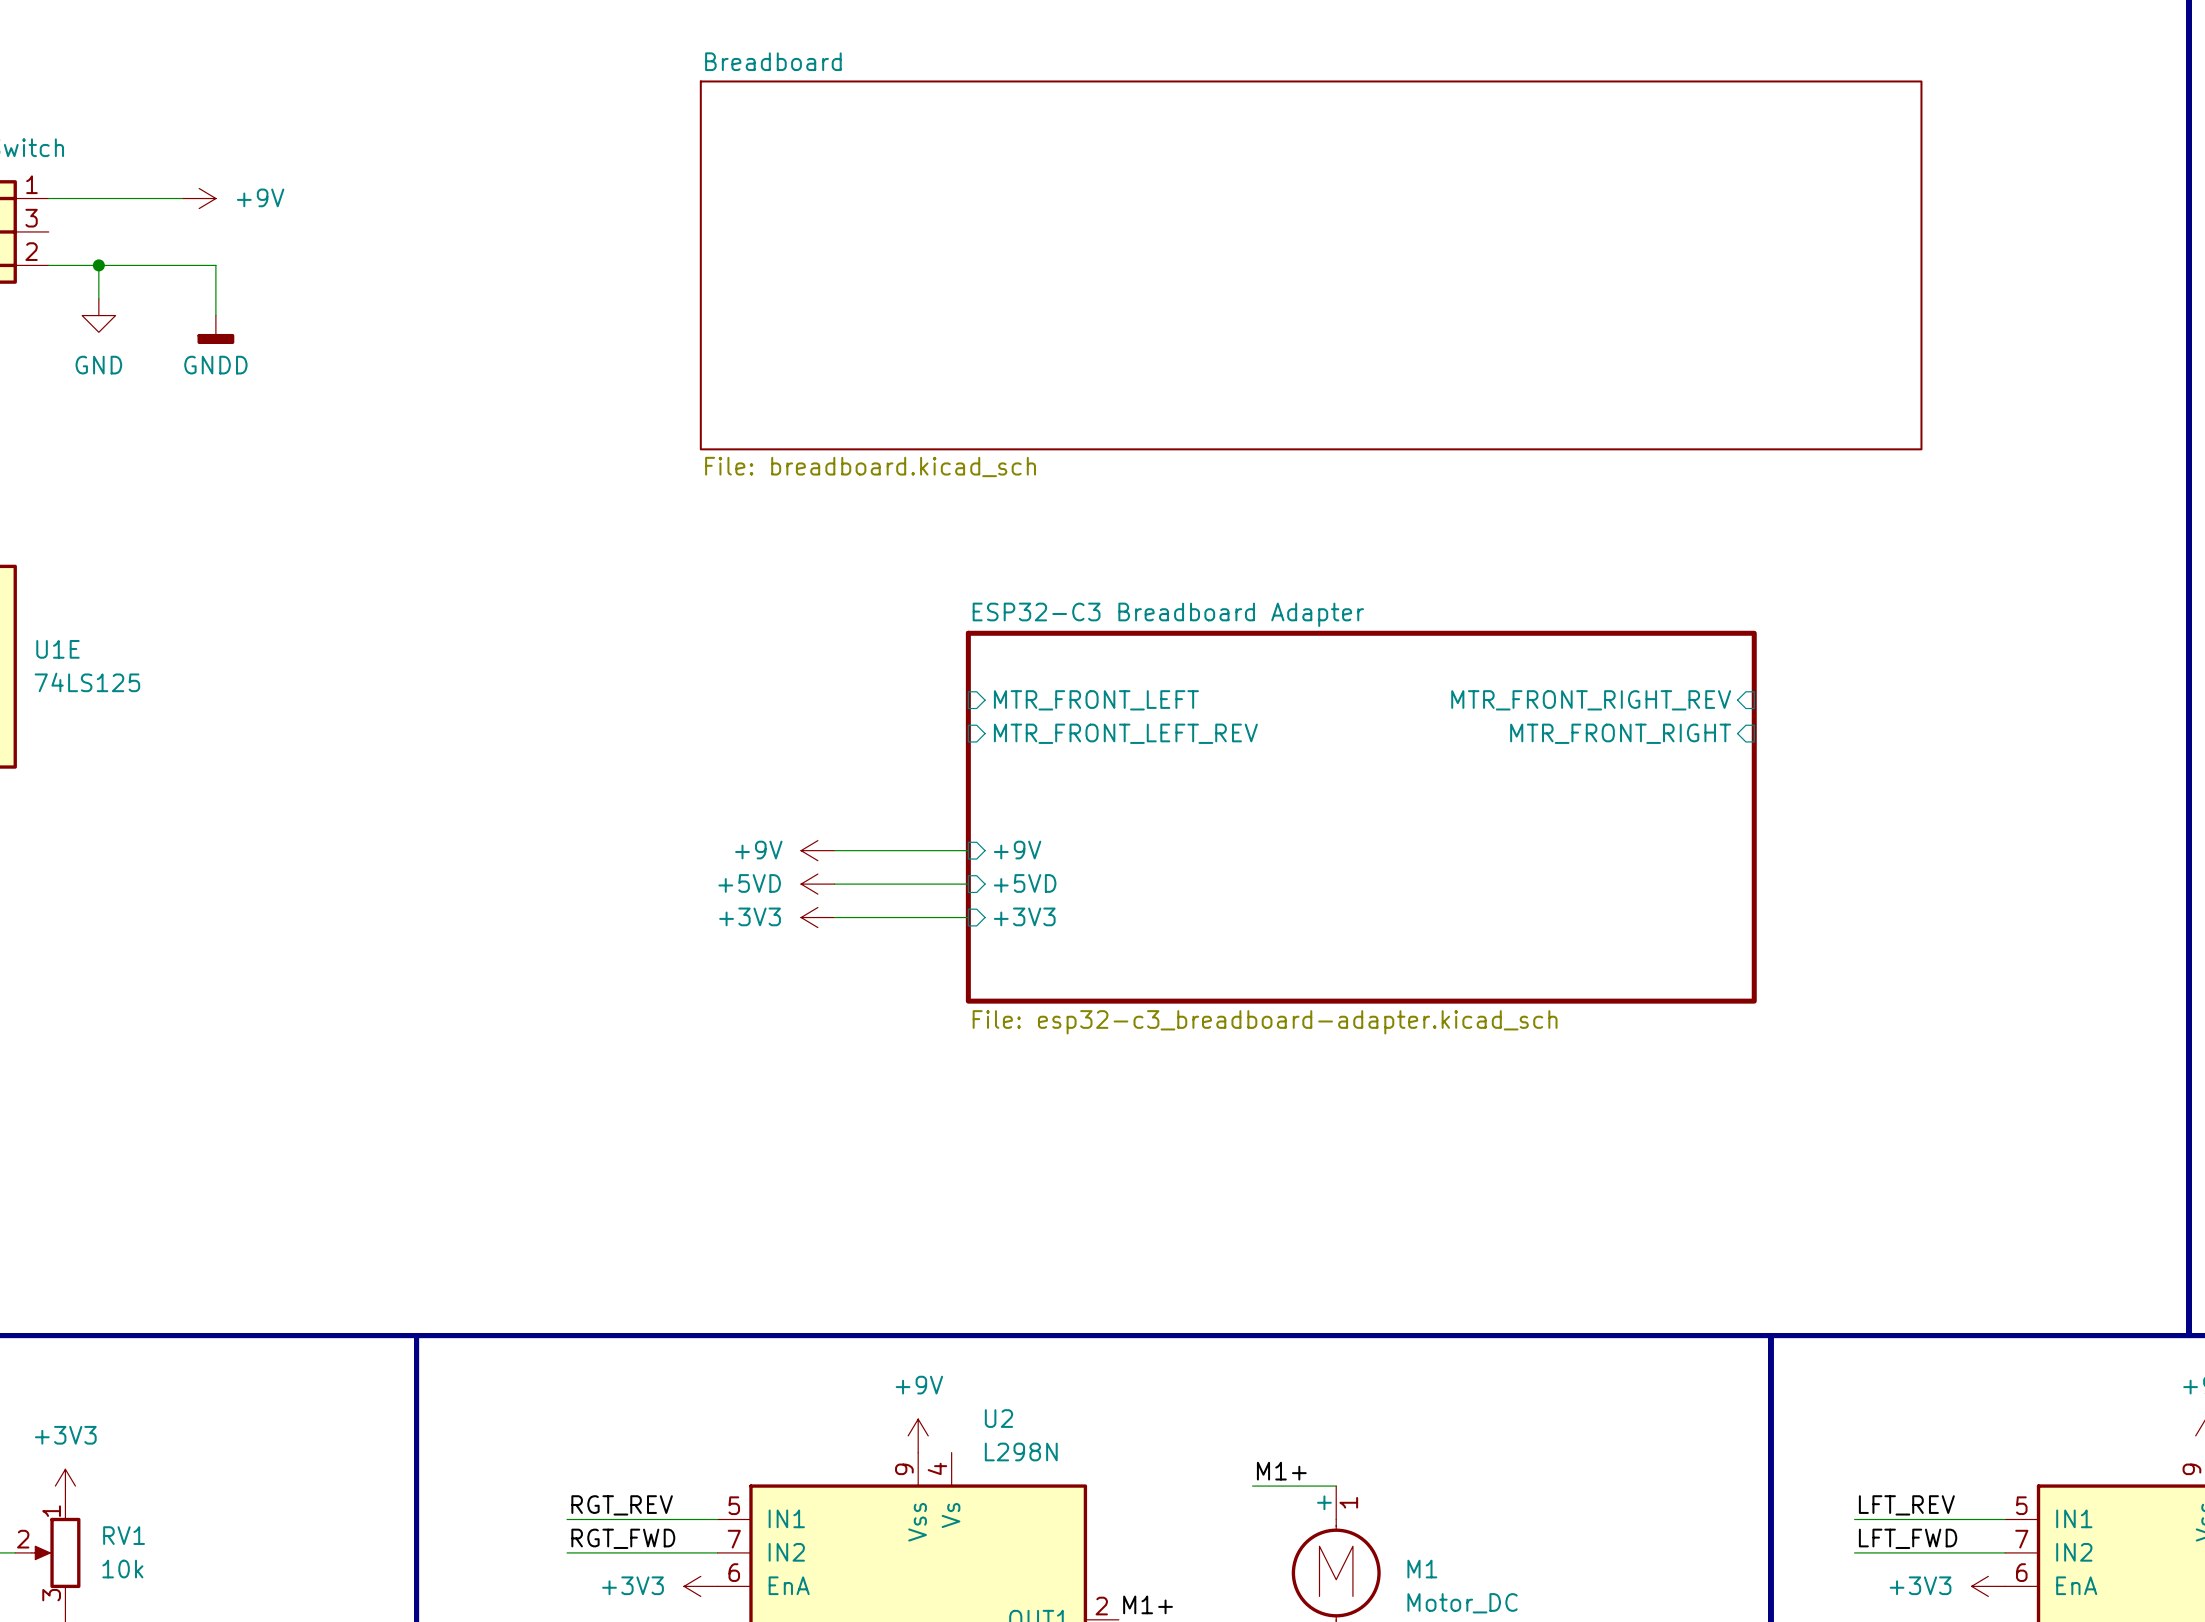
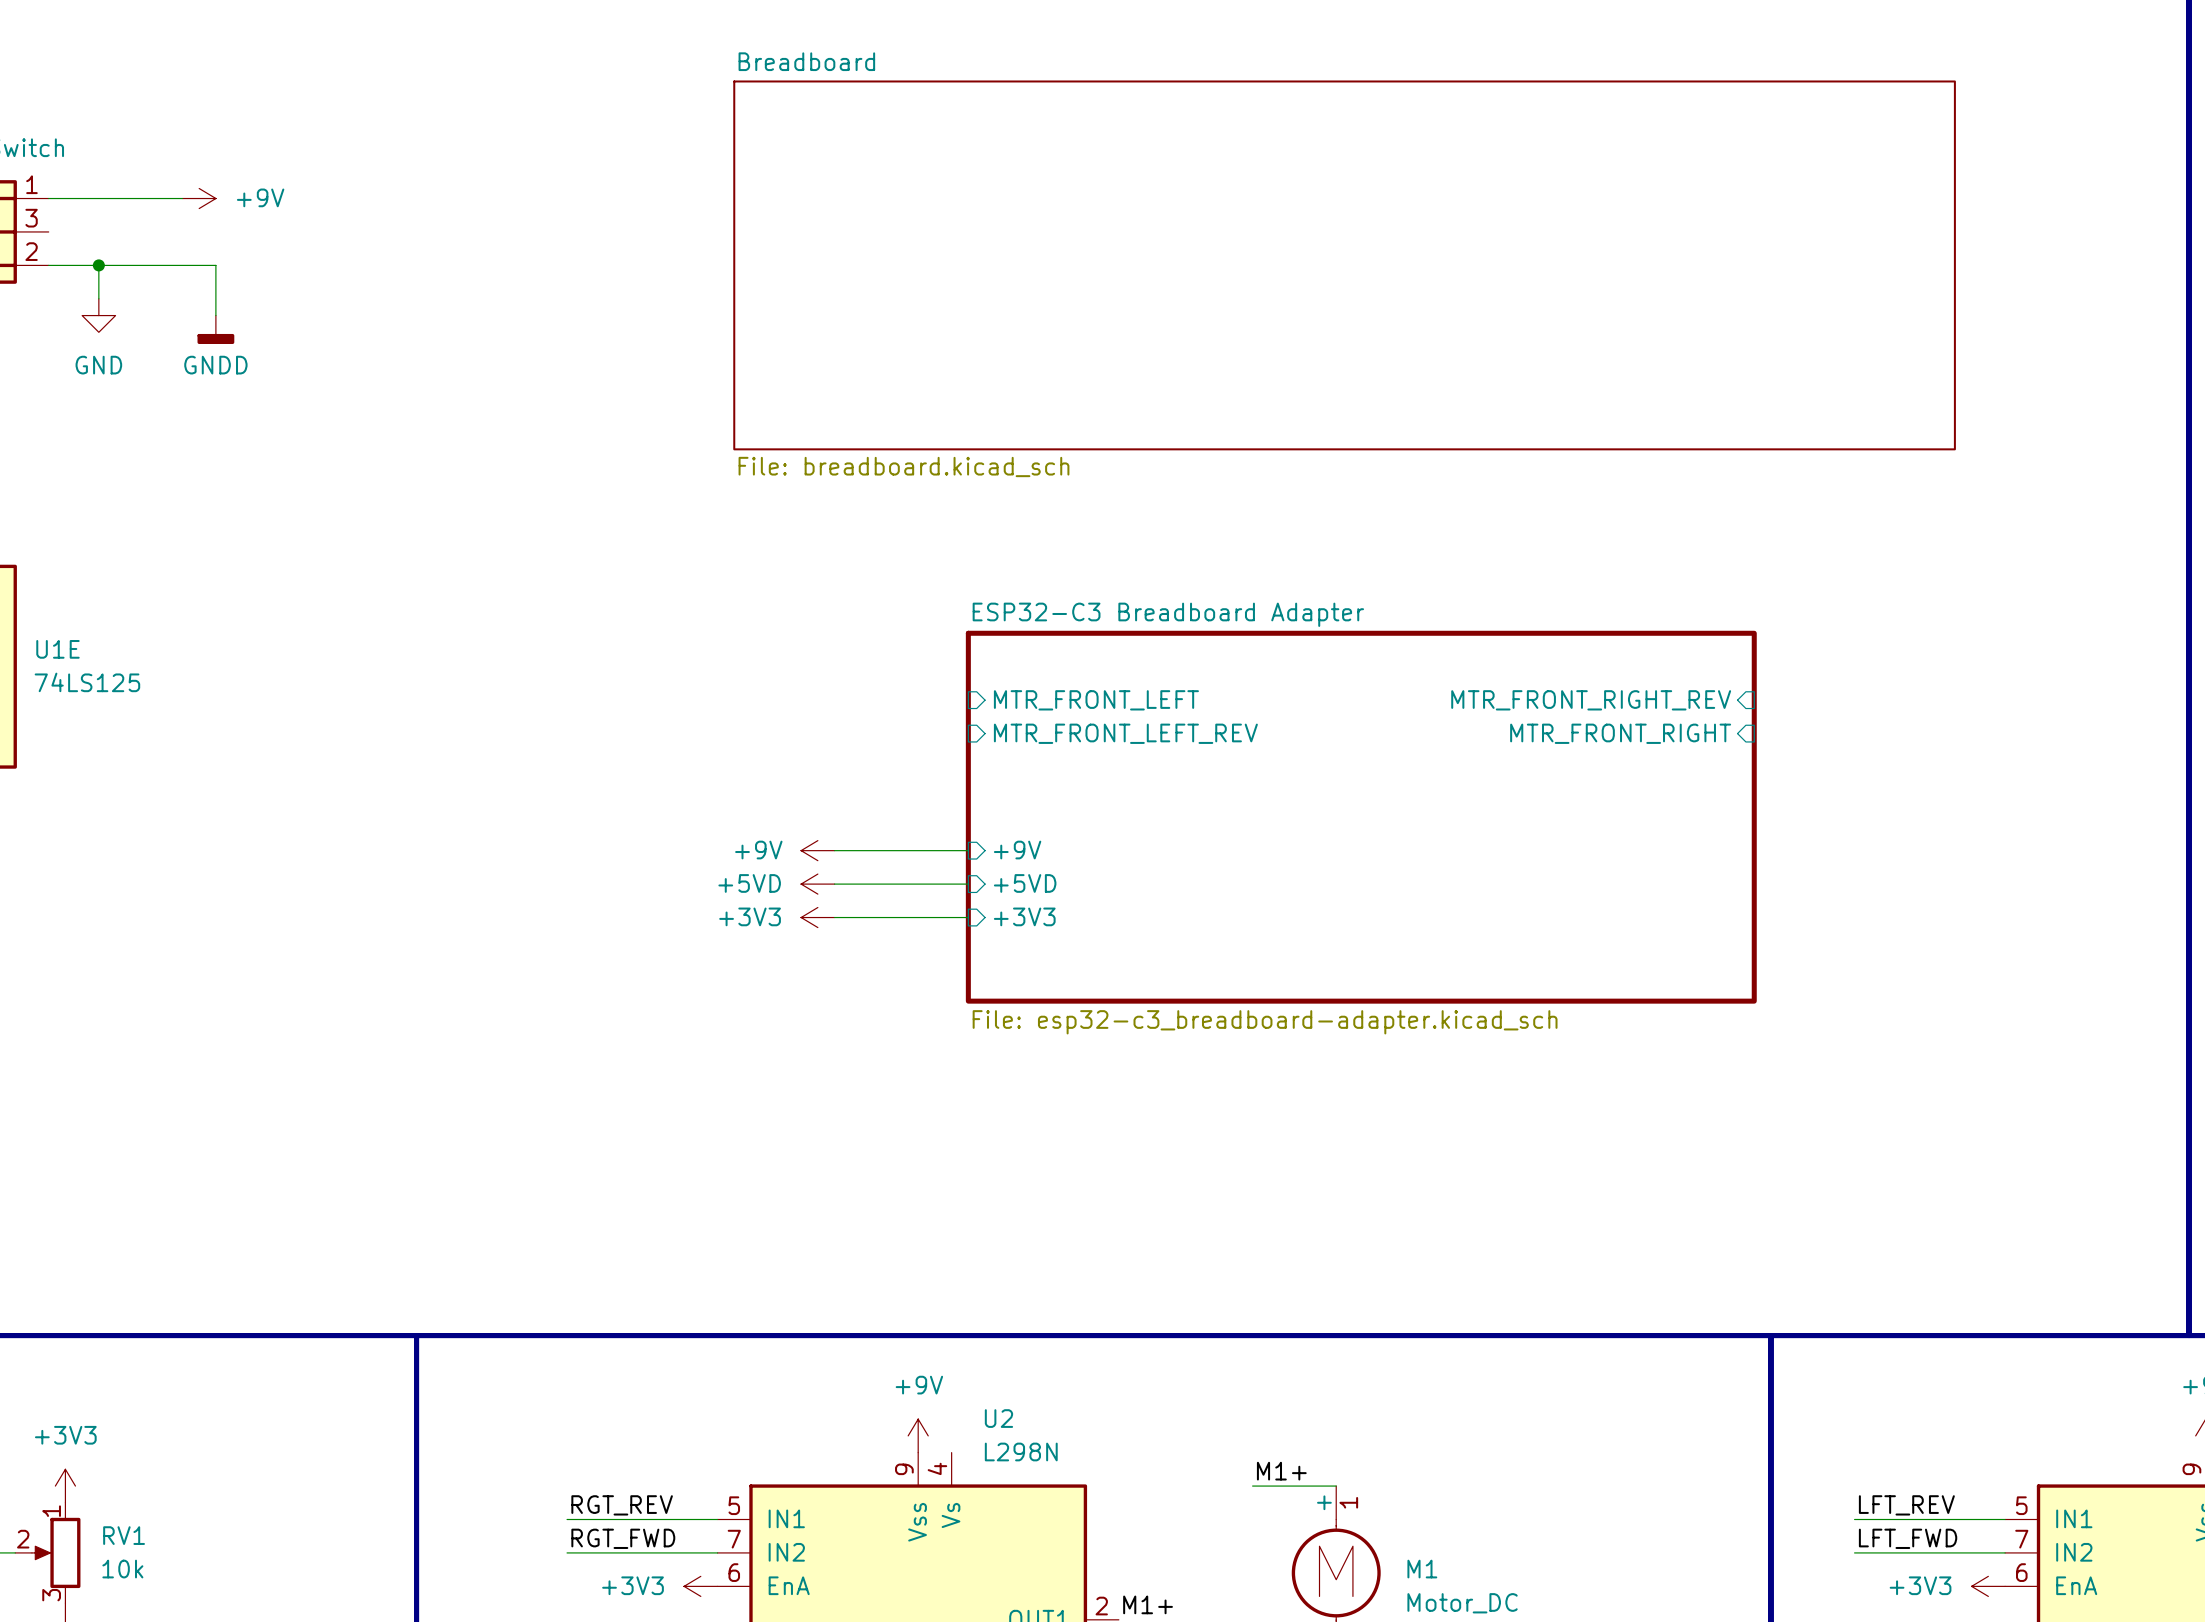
sheet Breadboard position: (1311, 265) -> (1344, 265)

